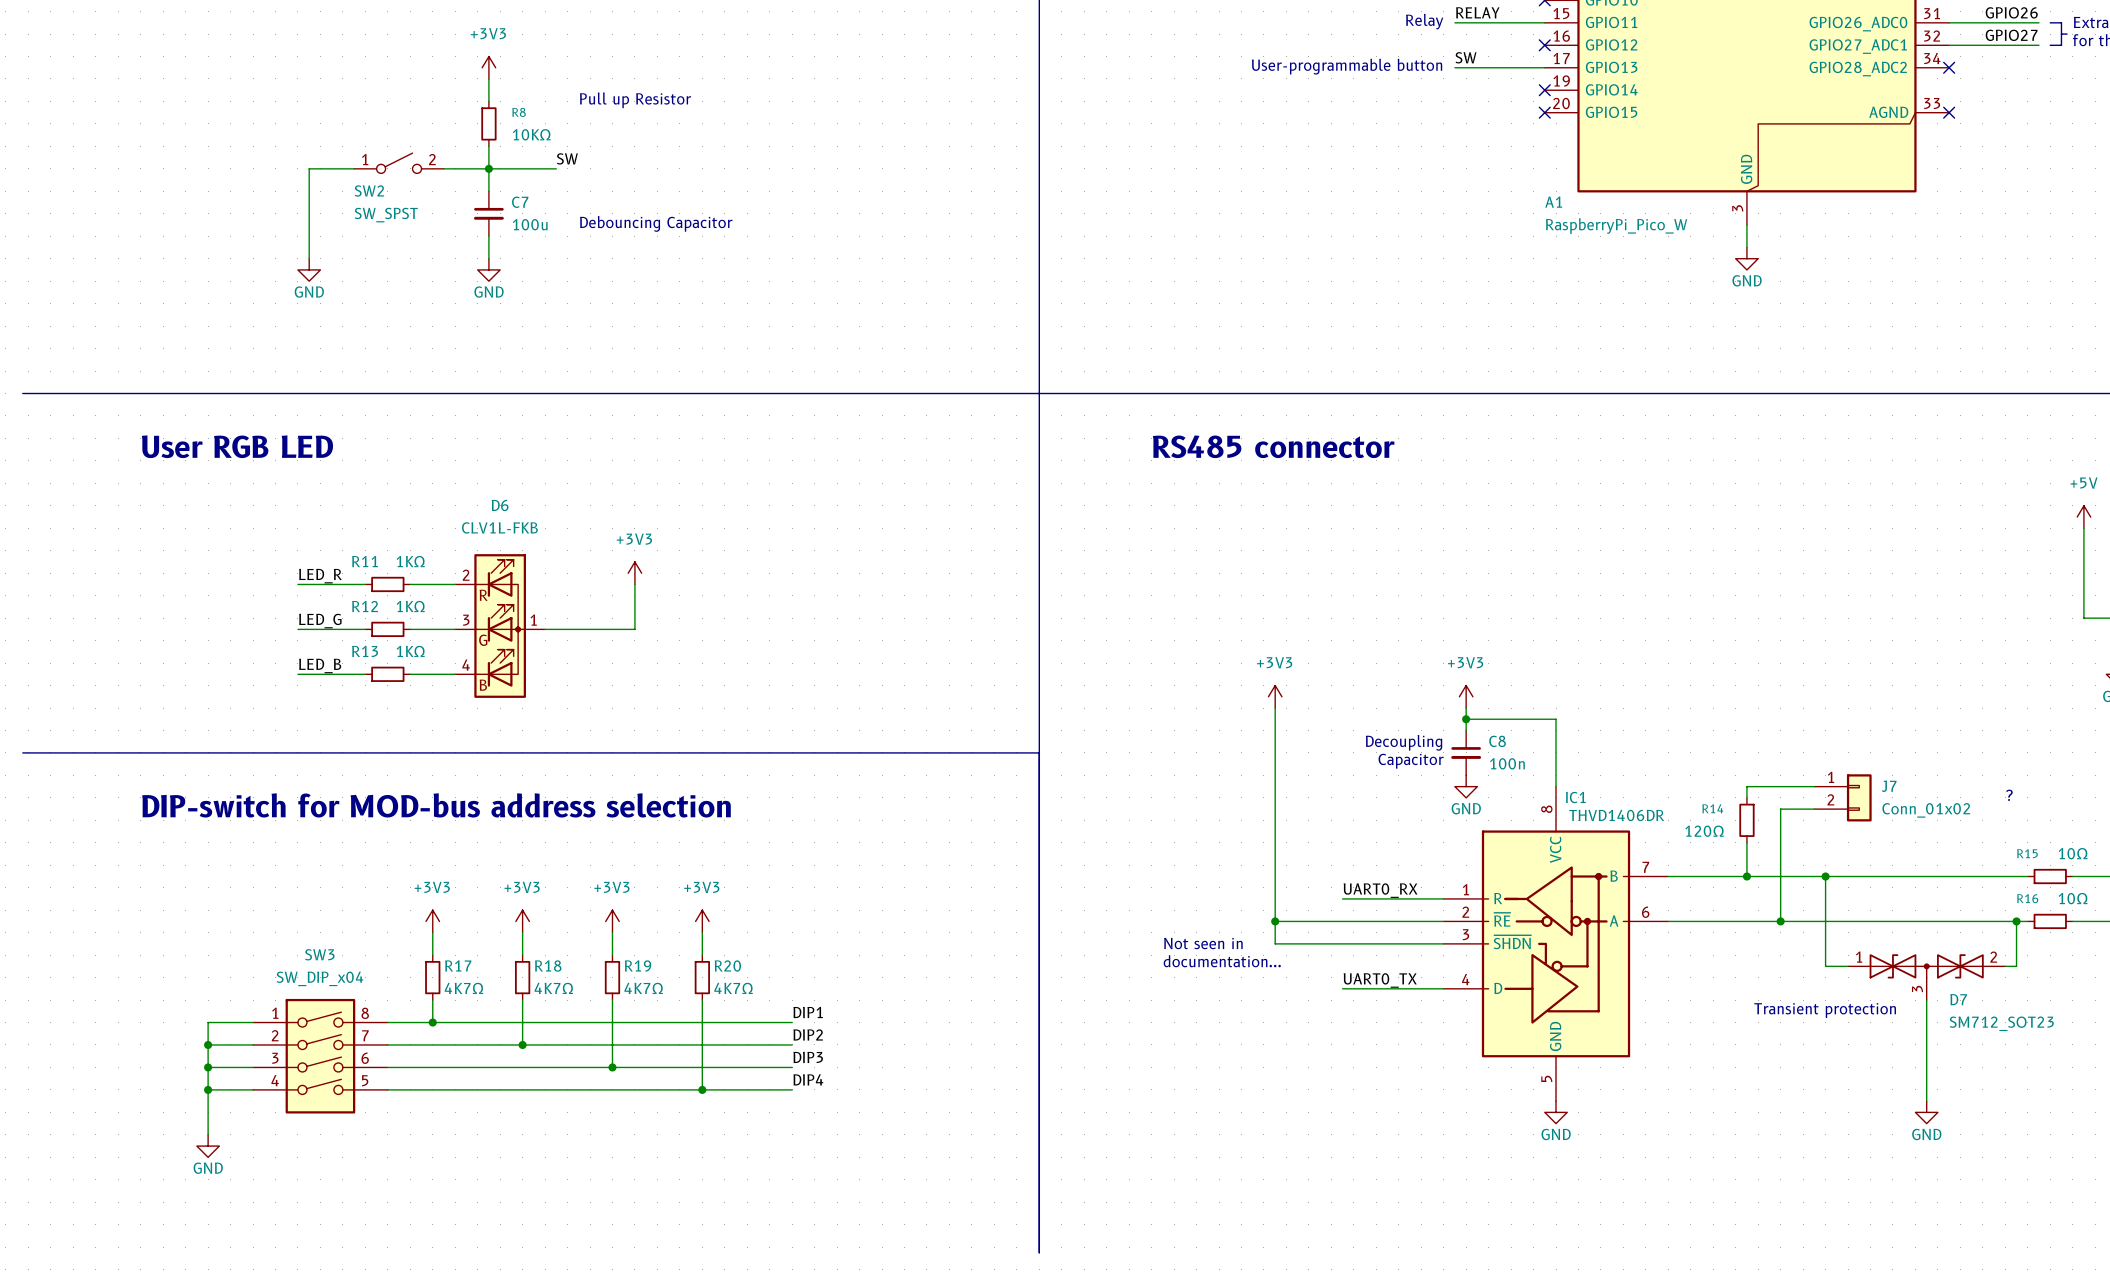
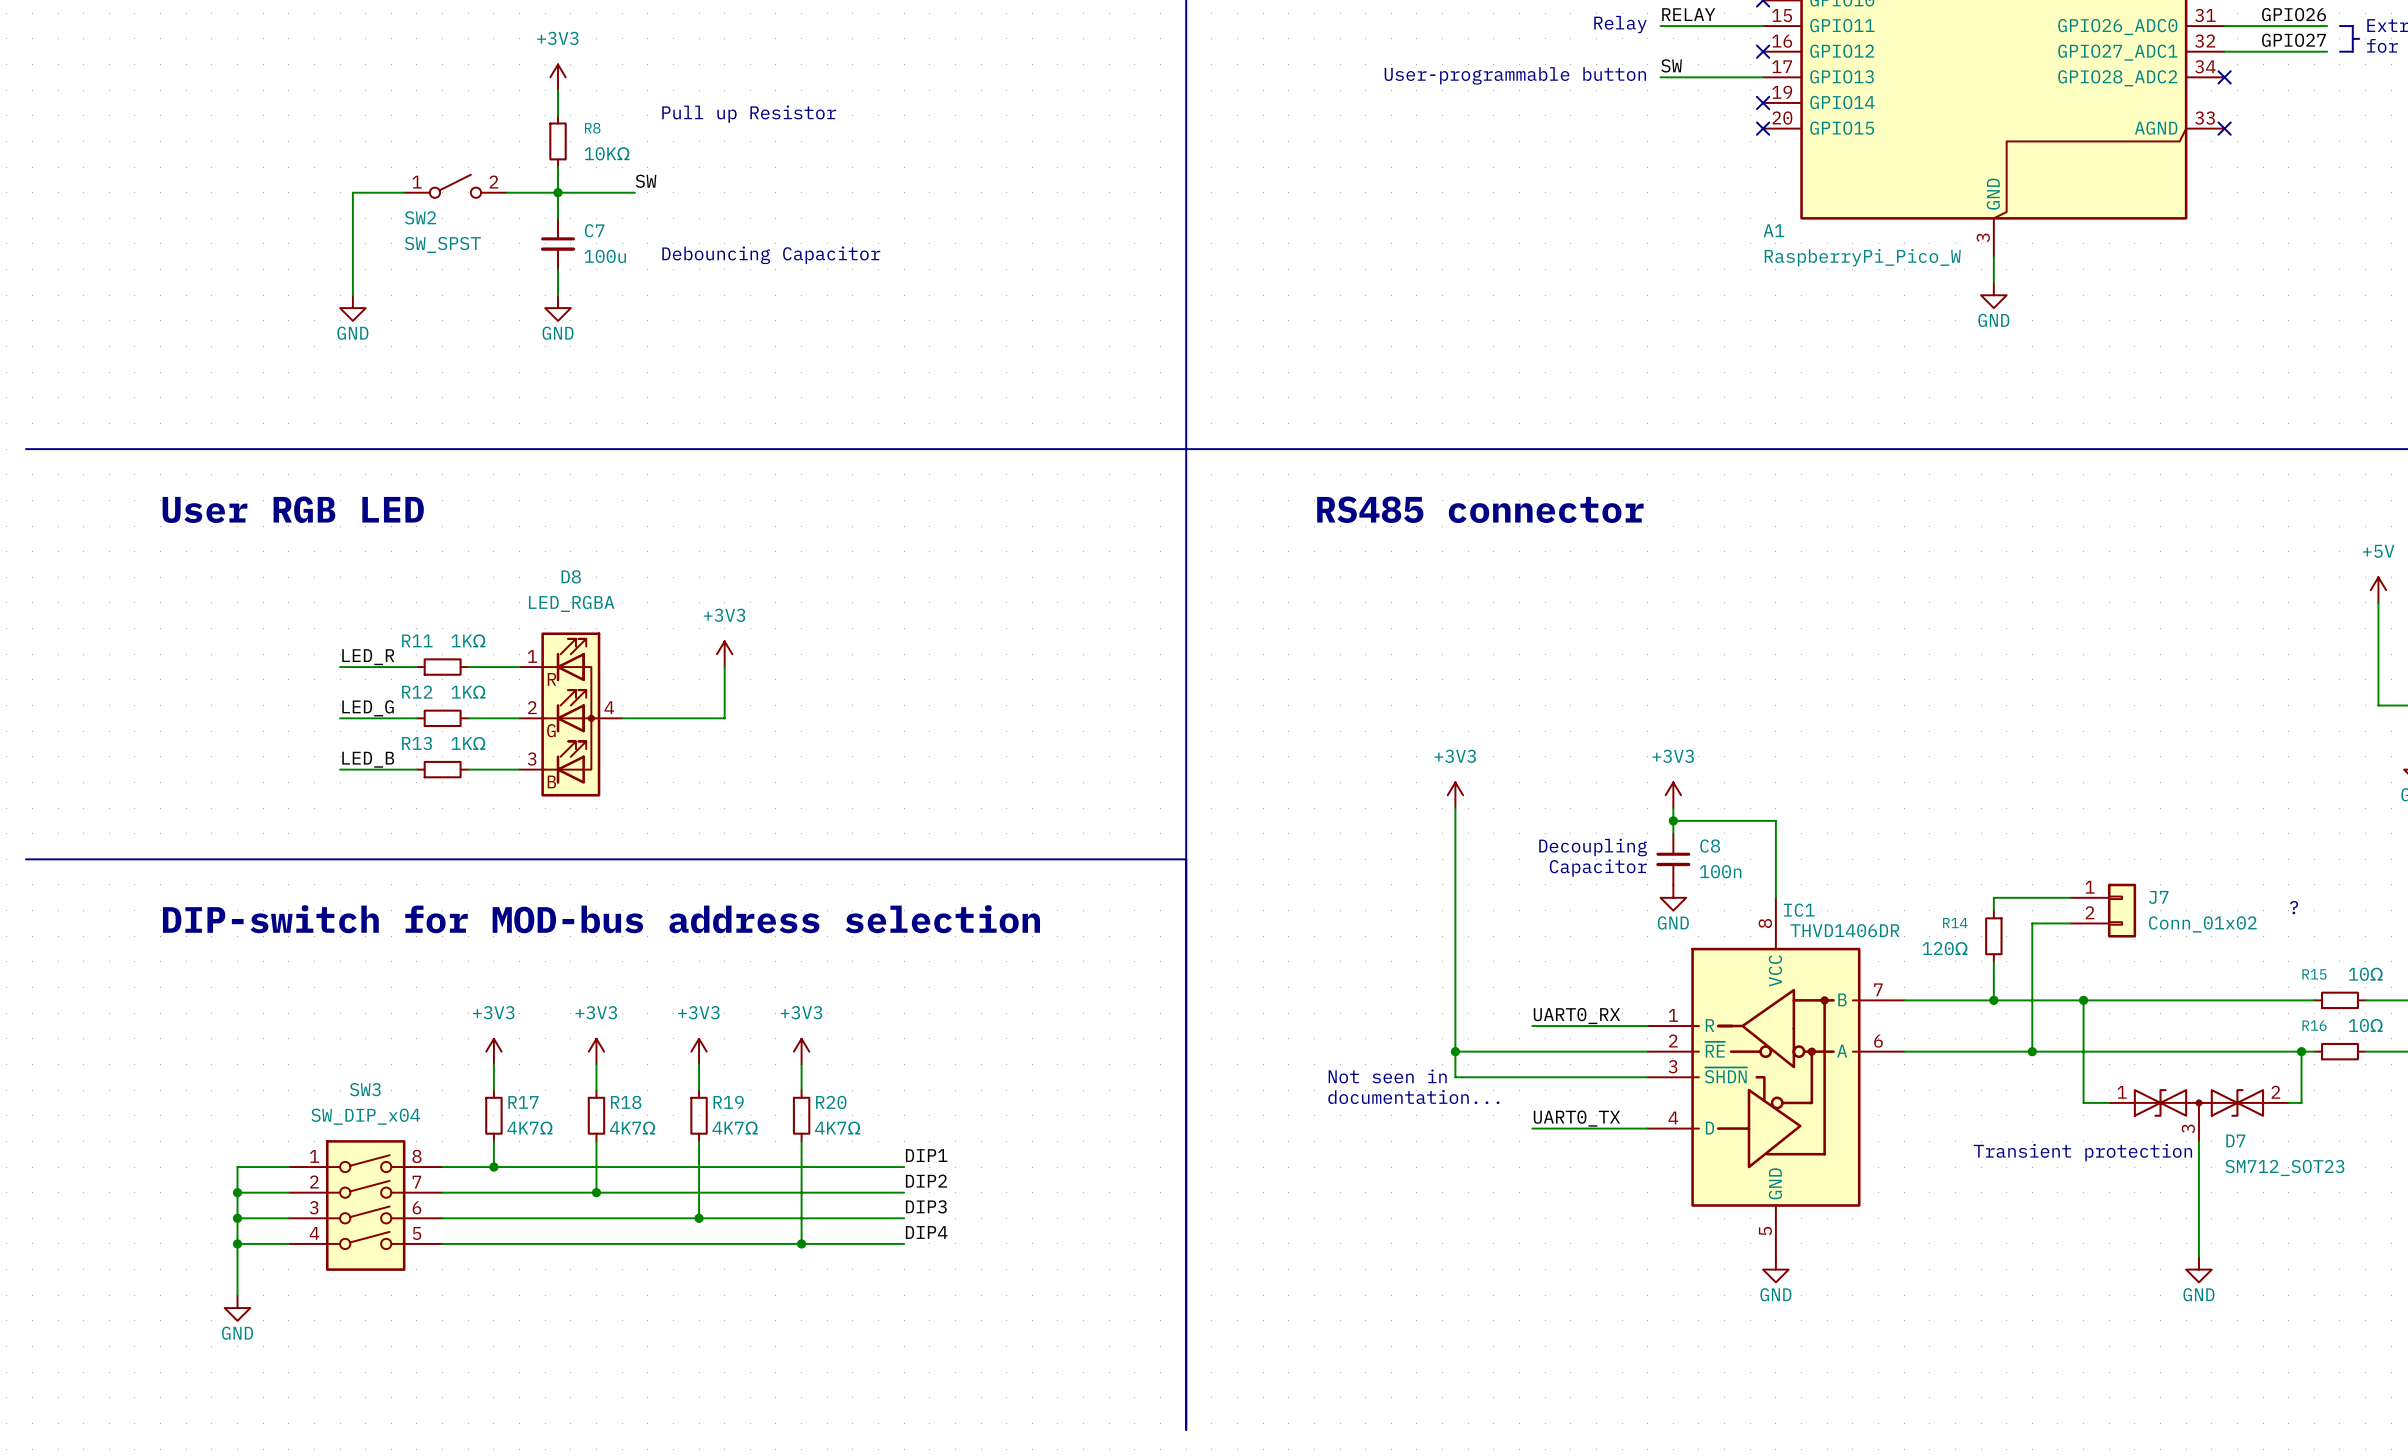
D6: CLV1L-FKB (500, 626) -> none
D8: none -> LED_RGBA (570, 714)

